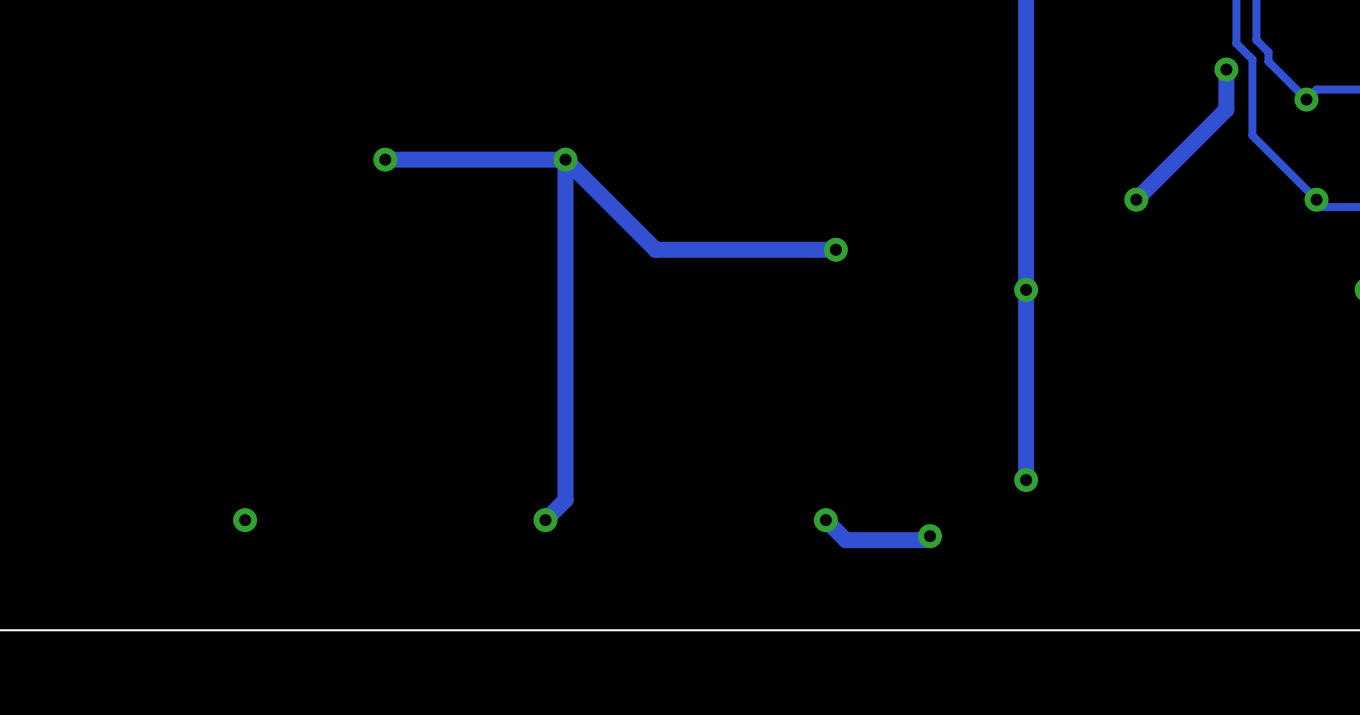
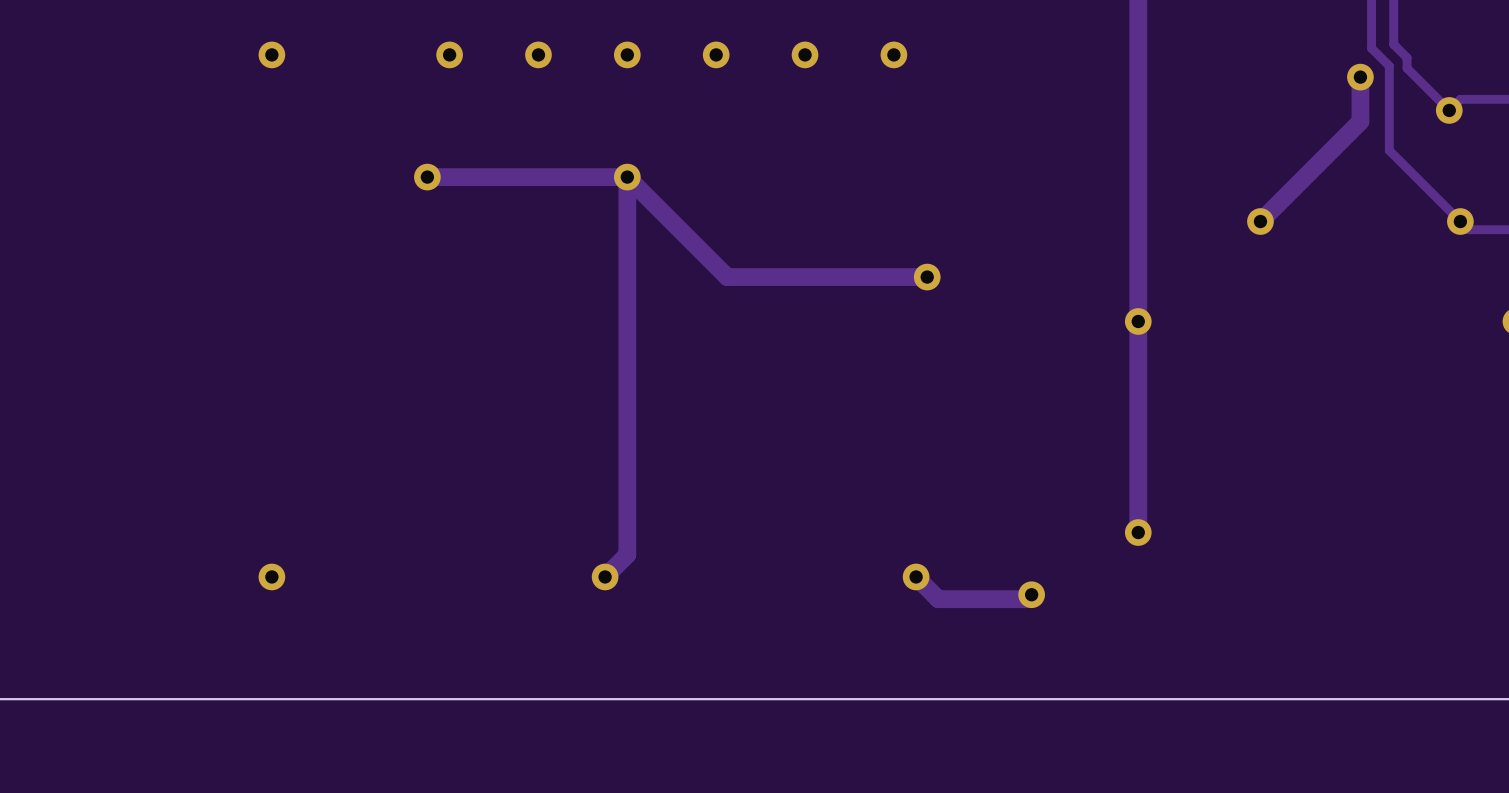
via: none -> (271, 54)
via: none -> (449, 54)
via: none -> (538, 54)
via: none -> (627, 54)
via: none -> (716, 54)
via: none -> (805, 54)
via: none -> (893, 54)

